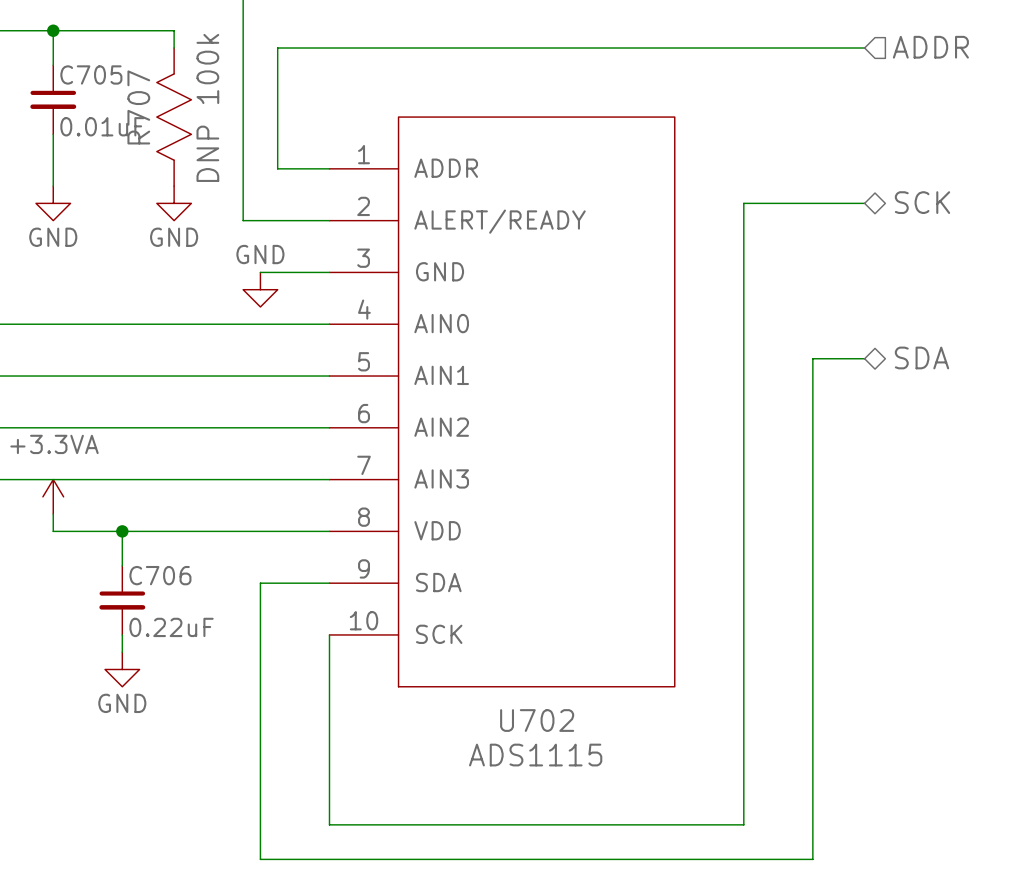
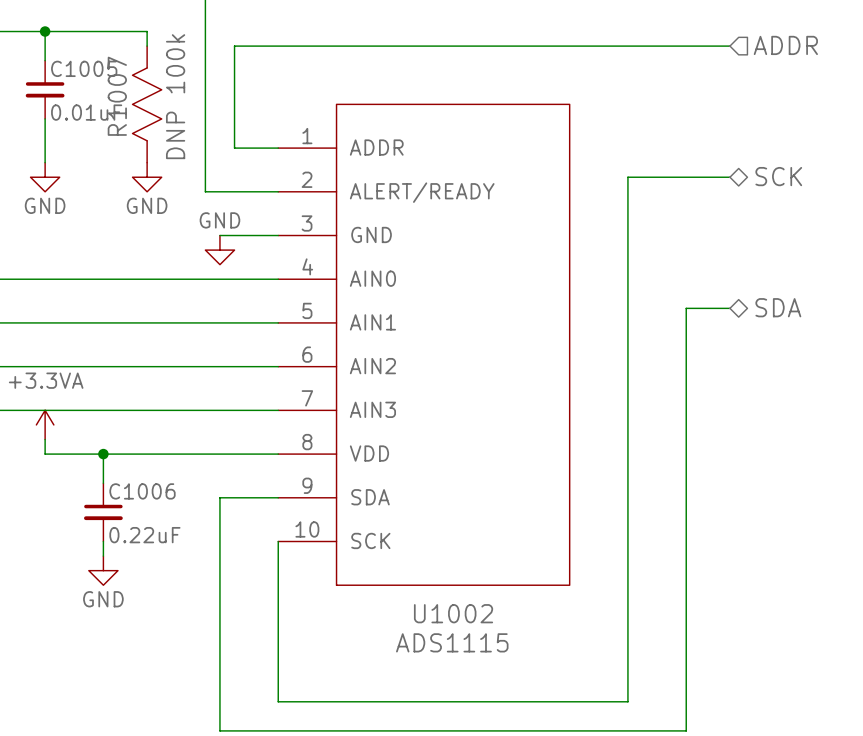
C705 name: C705 (91, 74) -> C1005 (84, 68)
R707 name: R707 (138, 107) -> R1007 (117, 96)
C706 name: C706 (160, 575) -> C1006 (142, 491)
U702 name: U702 (537, 720) -> U1002 (453, 613)

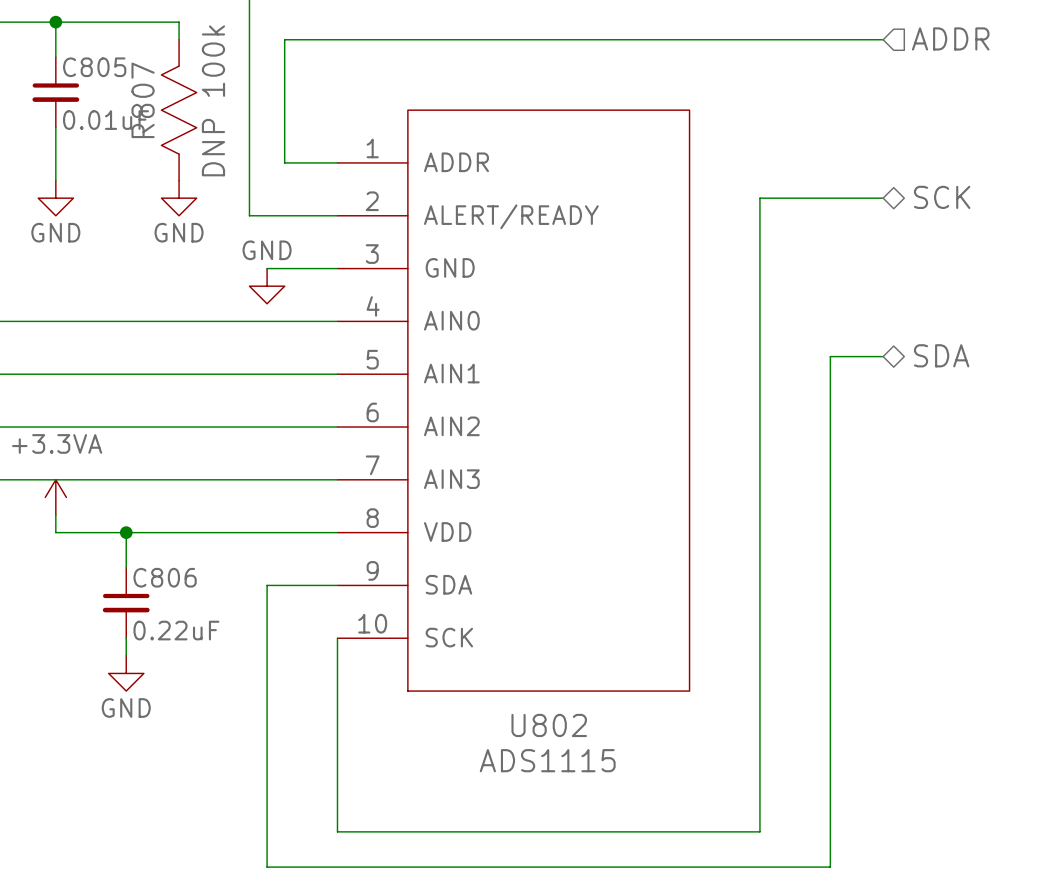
C1005 name: C1005 (84, 68) -> C805 (94, 67)
R1007 name: R1007 (117, 96) -> R807 (143, 100)
C1006 name: C1006 (142, 491) -> C806 (165, 577)
U1002 name: U1002 (453, 613) -> U802 (549, 725)

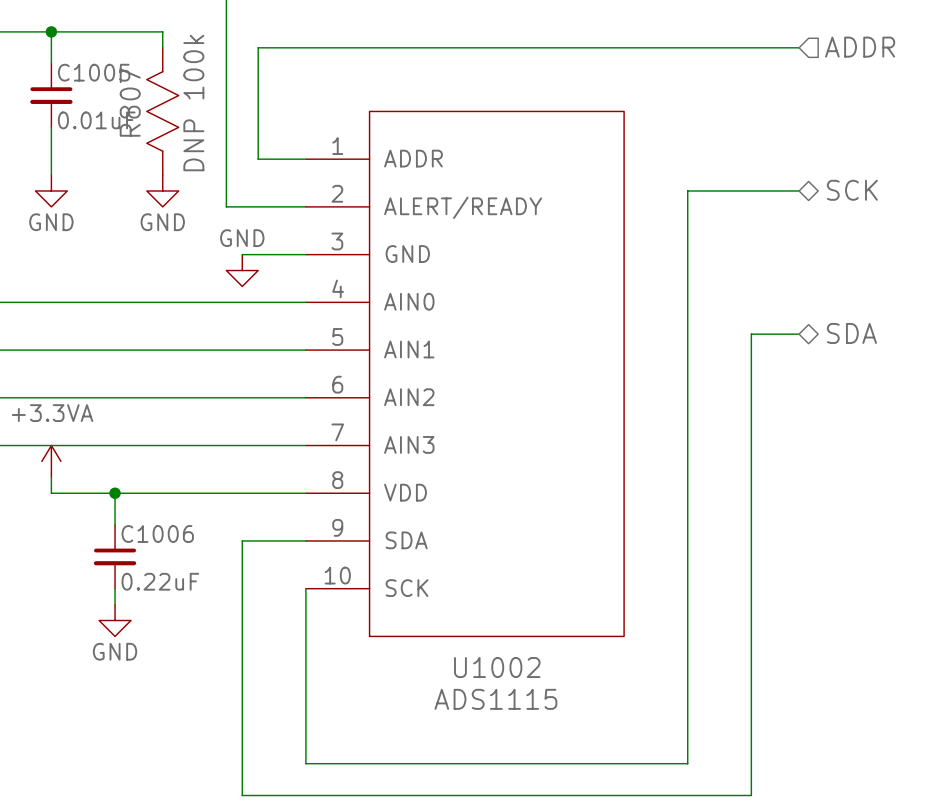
C805 name: C805 (94, 67) -> C1005 (94, 72)
C806 name: C806 (165, 577) -> C1006 (157, 534)
U802 name: U802 (549, 725) -> U1002 (497, 667)

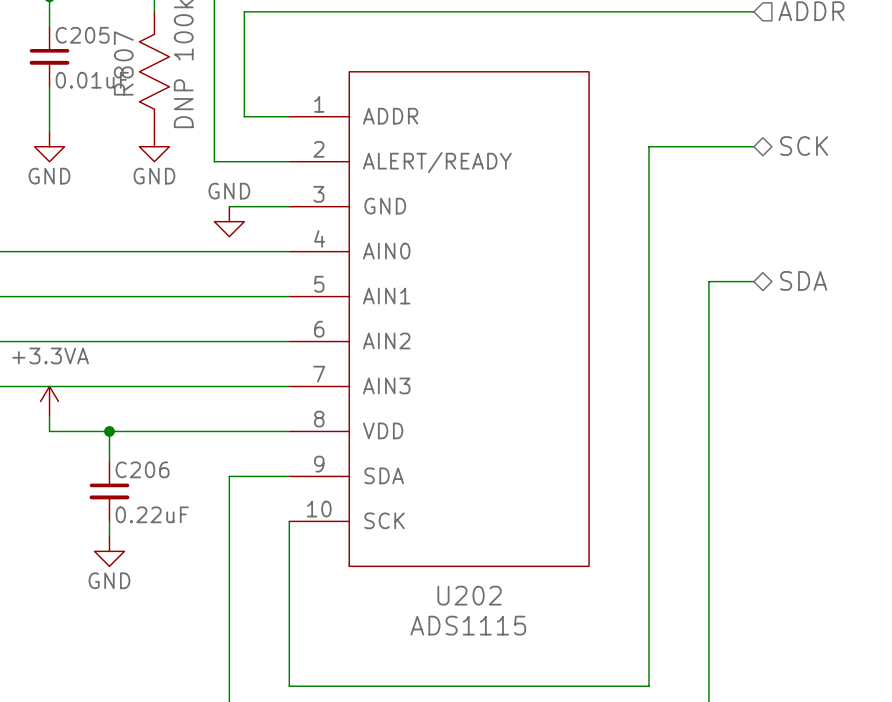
C1005 name: C1005 (94, 72) -> C205 (82, 35)
C1006 name: C1006 (157, 534) -> C206 (142, 469)
U1002 name: U1002 (497, 667) -> U202 (469, 595)

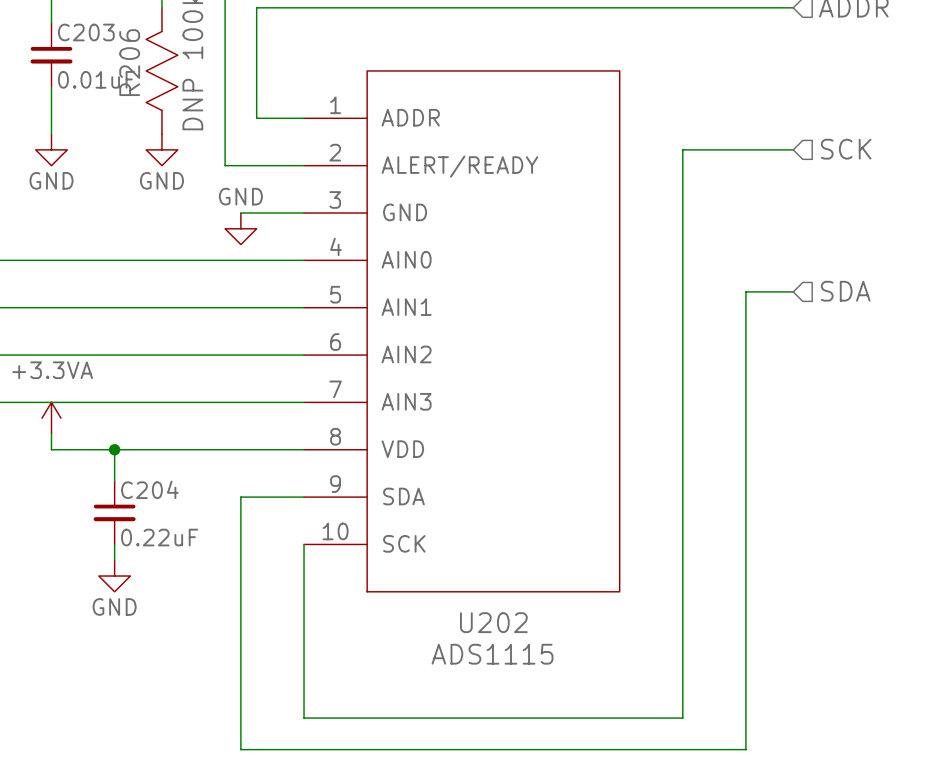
C205 name: C205 (82, 35) -> C203 (86, 32)
R807 name: R807 (123, 63) -> R206 (129, 62)
hierarchical label shape: bidirectional (804, 146) -> input (846, 149)
hierarchical label shape: bidirectional (803, 280) -> input (845, 291)
C206 name: C206 (142, 469) -> C204 (149, 489)

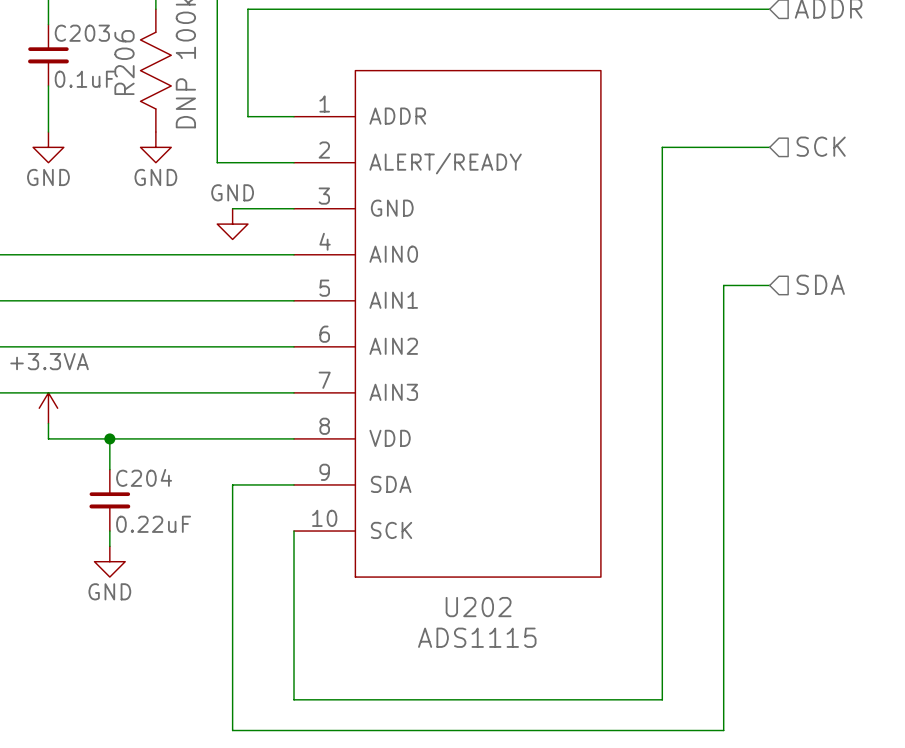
C203 value: 0.01uF (96, 79) -> 0.1uF (84, 79)

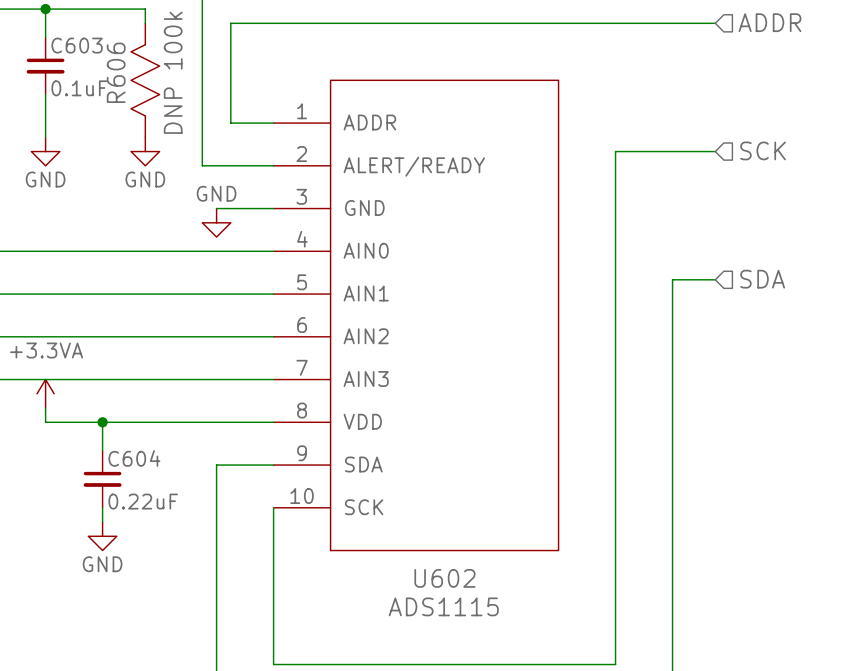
C203 name: C203 (82, 33) -> C603 (77, 45)
R206 name: R206 (124, 62) -> R606 (116, 72)
C204 name: C204 (144, 477) -> C604 (134, 458)
U202 name: U202 (478, 607) -> U602 (444, 578)

